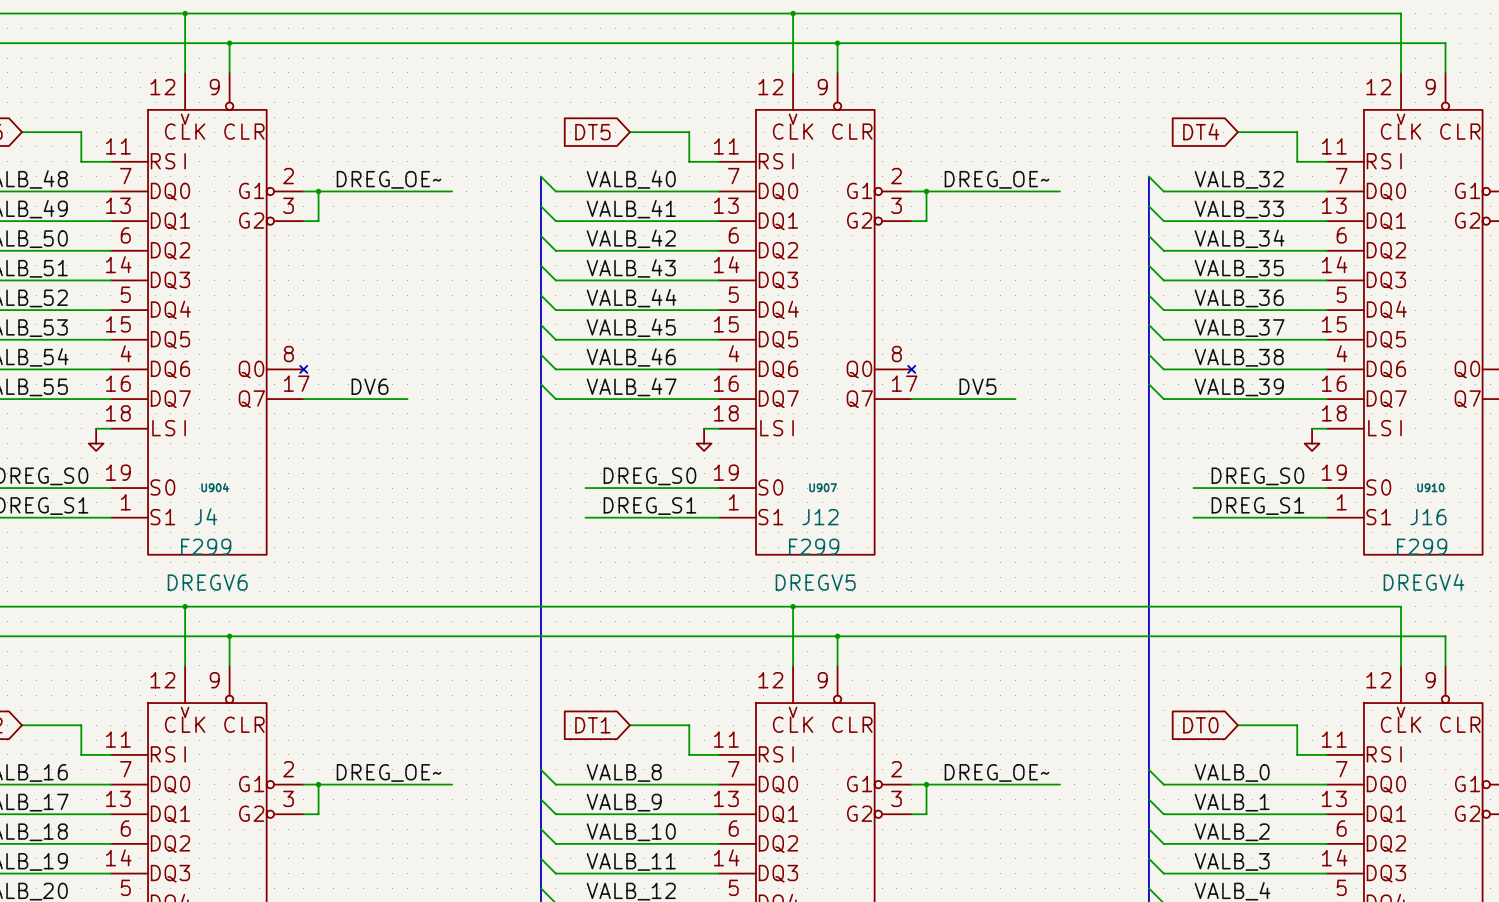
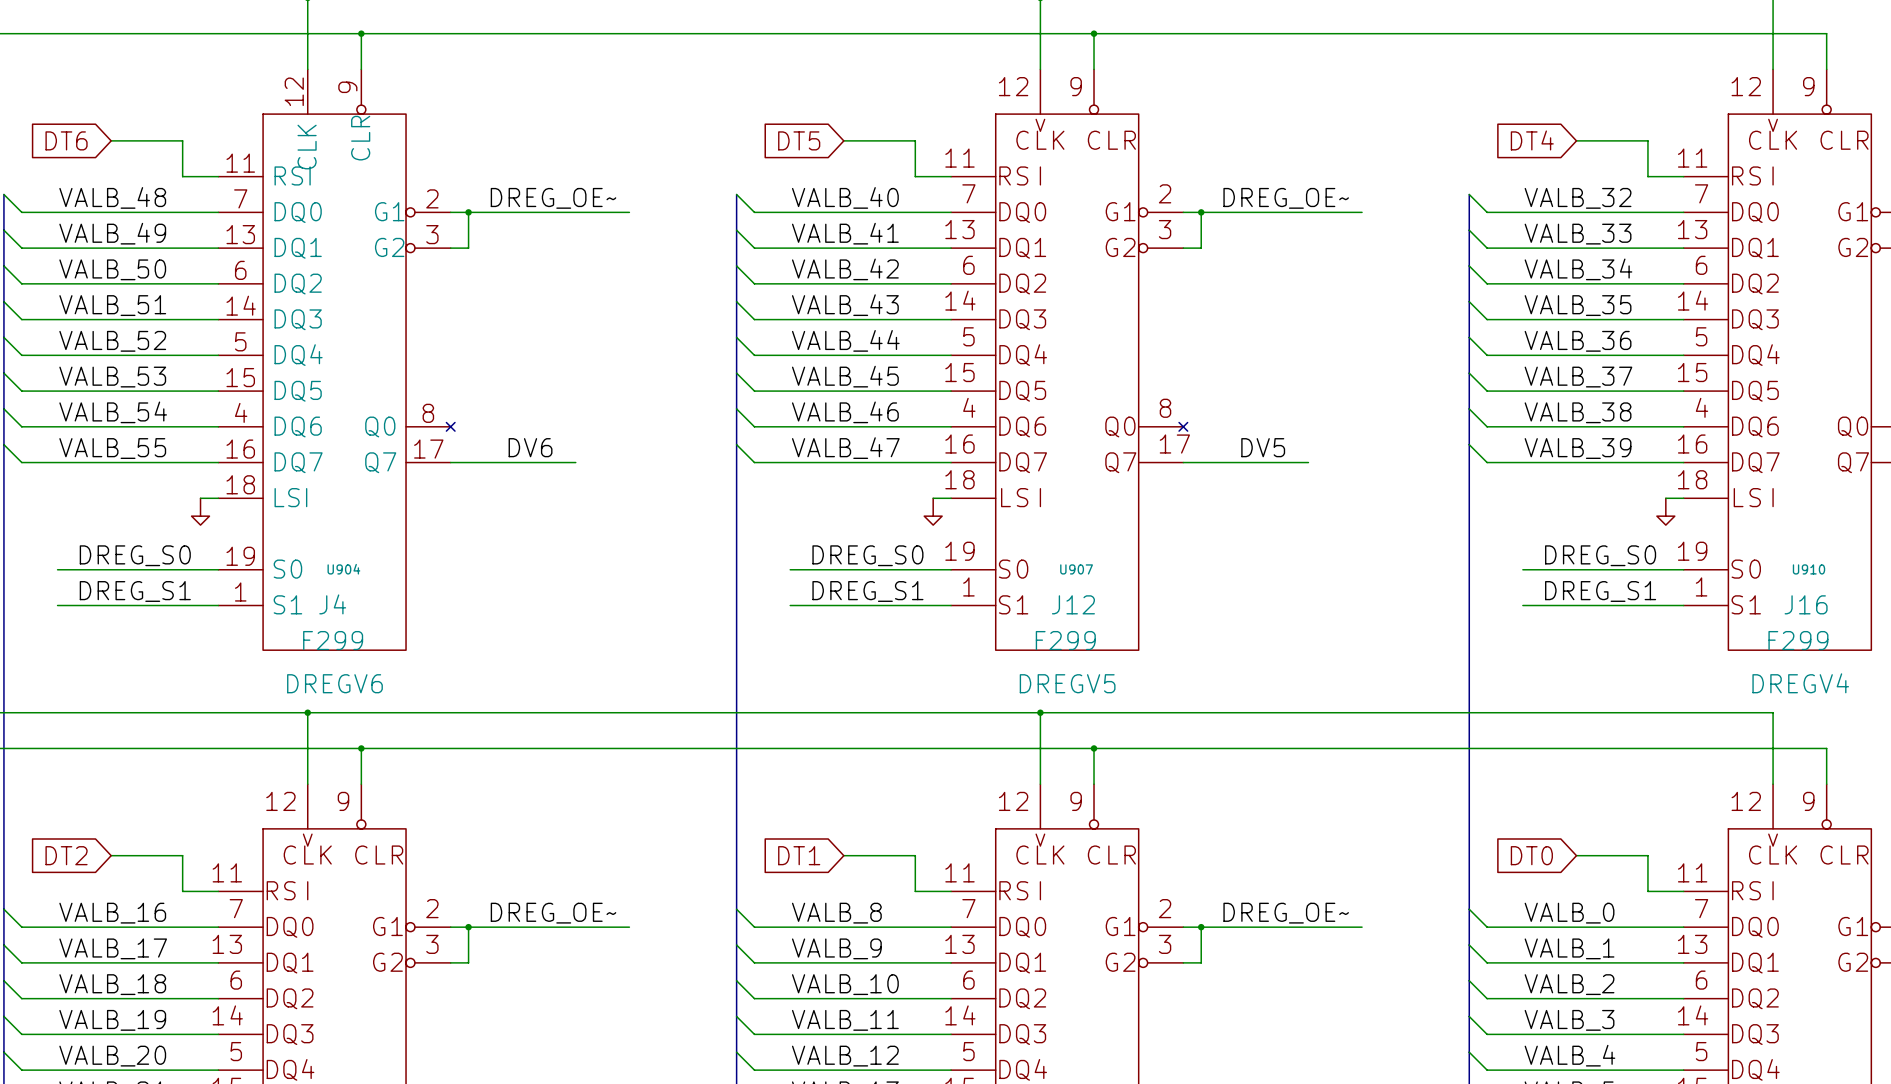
U904 symbol: [110, 72, 304, 555] -> [218, 69, 451, 651]

